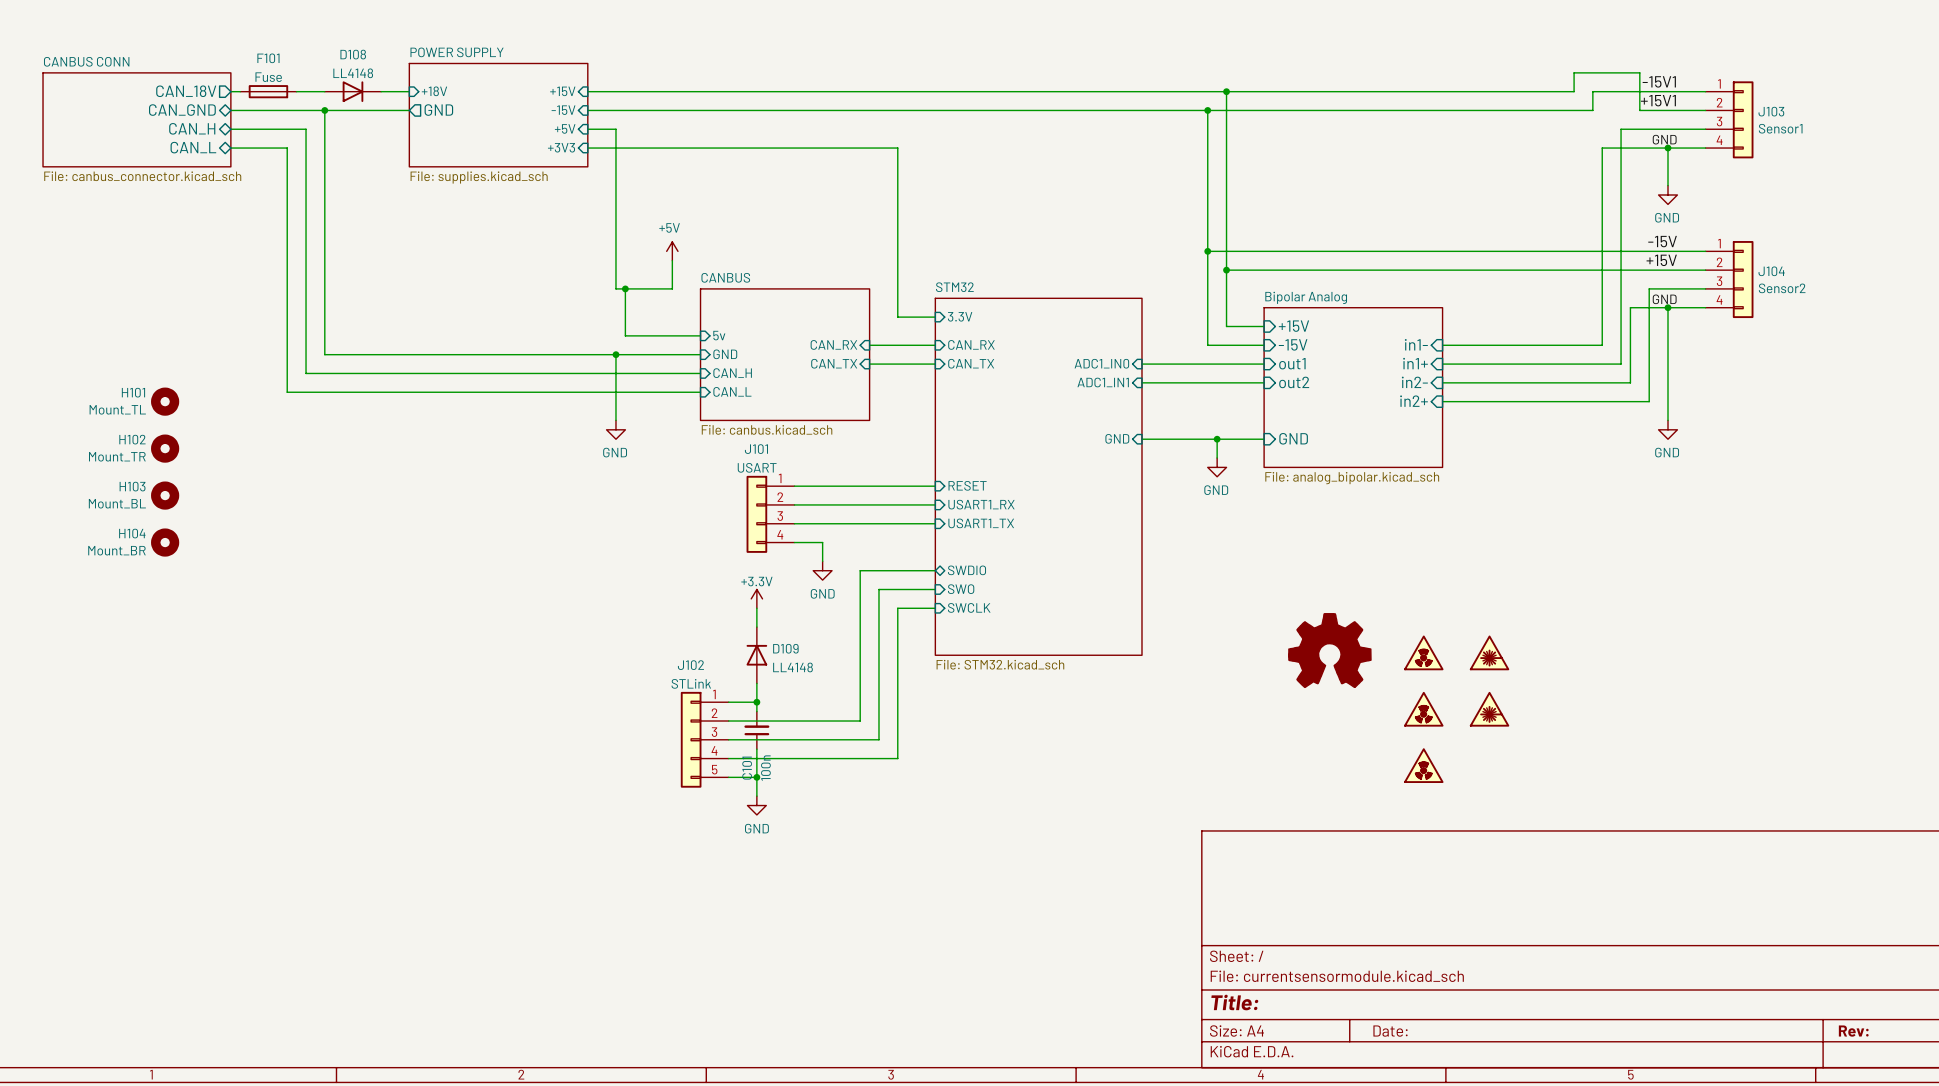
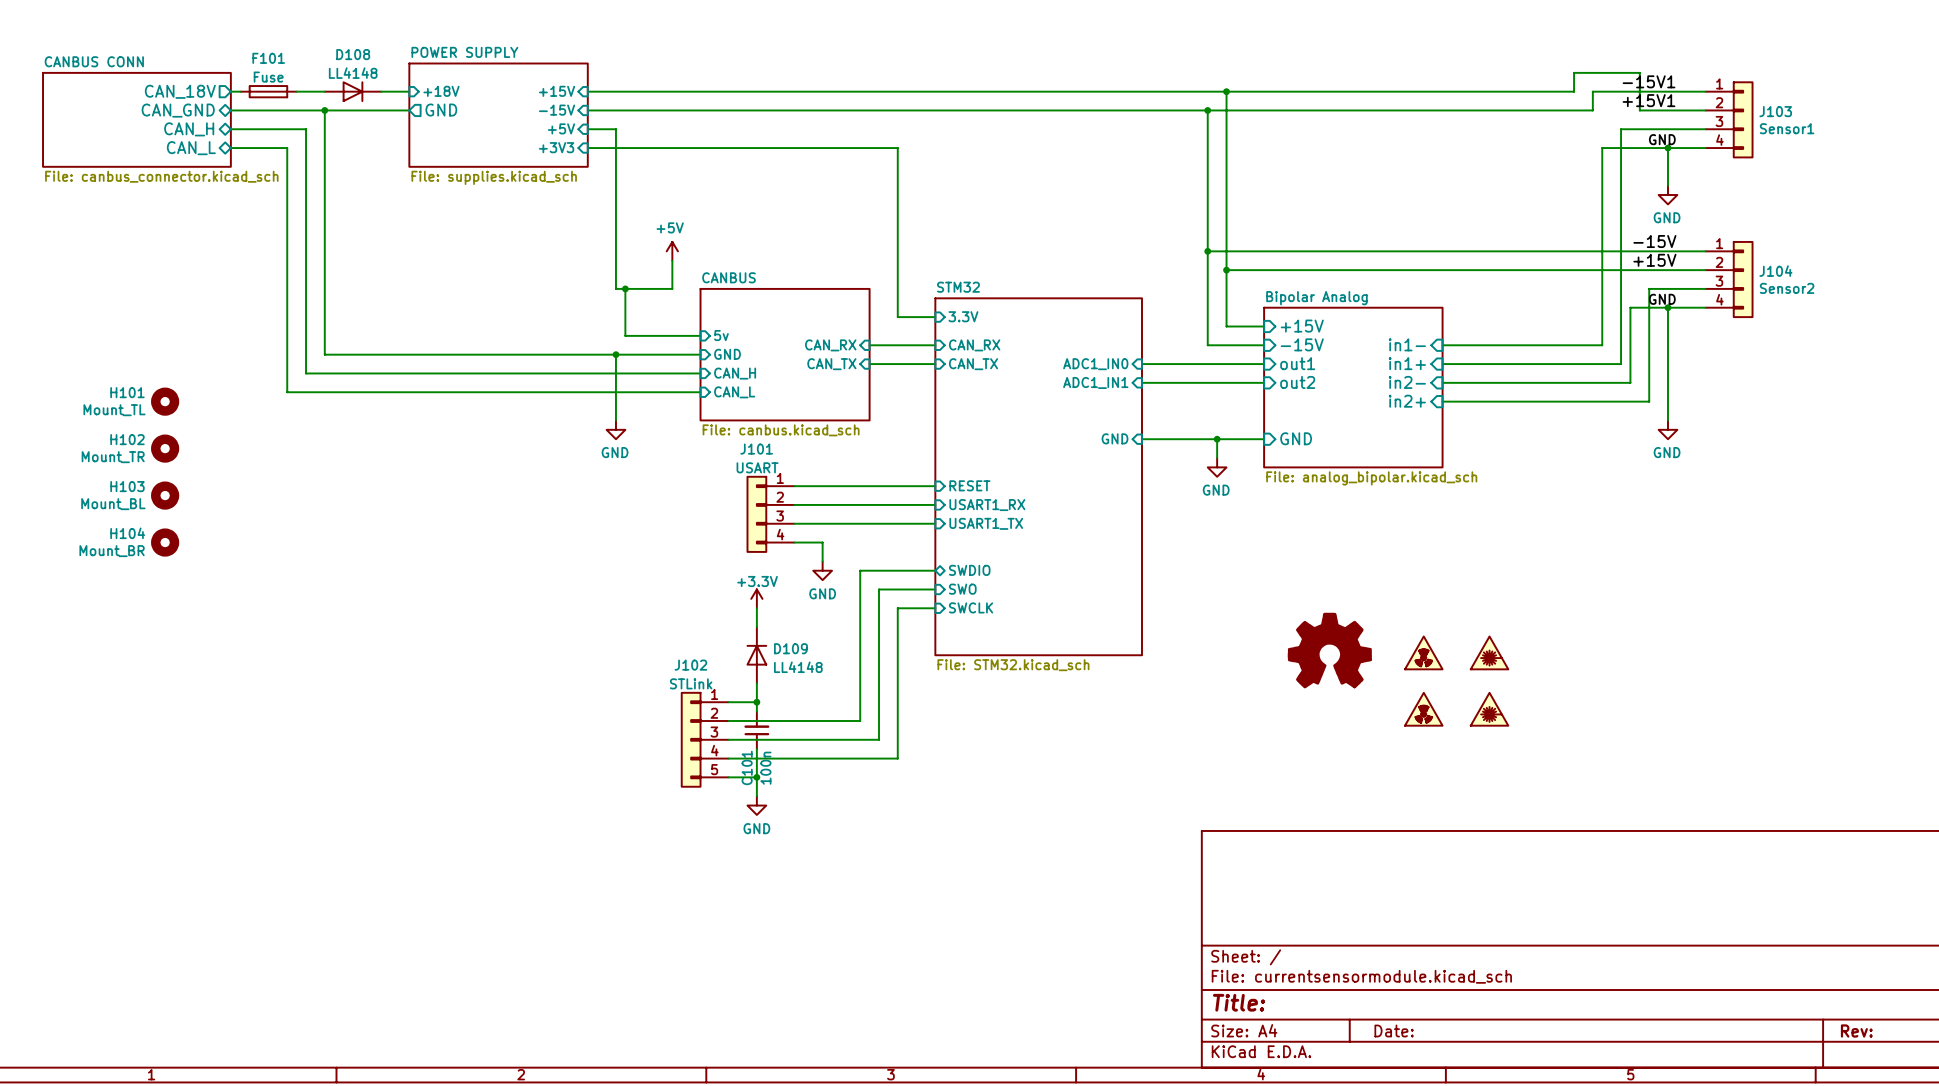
part: (1423, 765) -> none

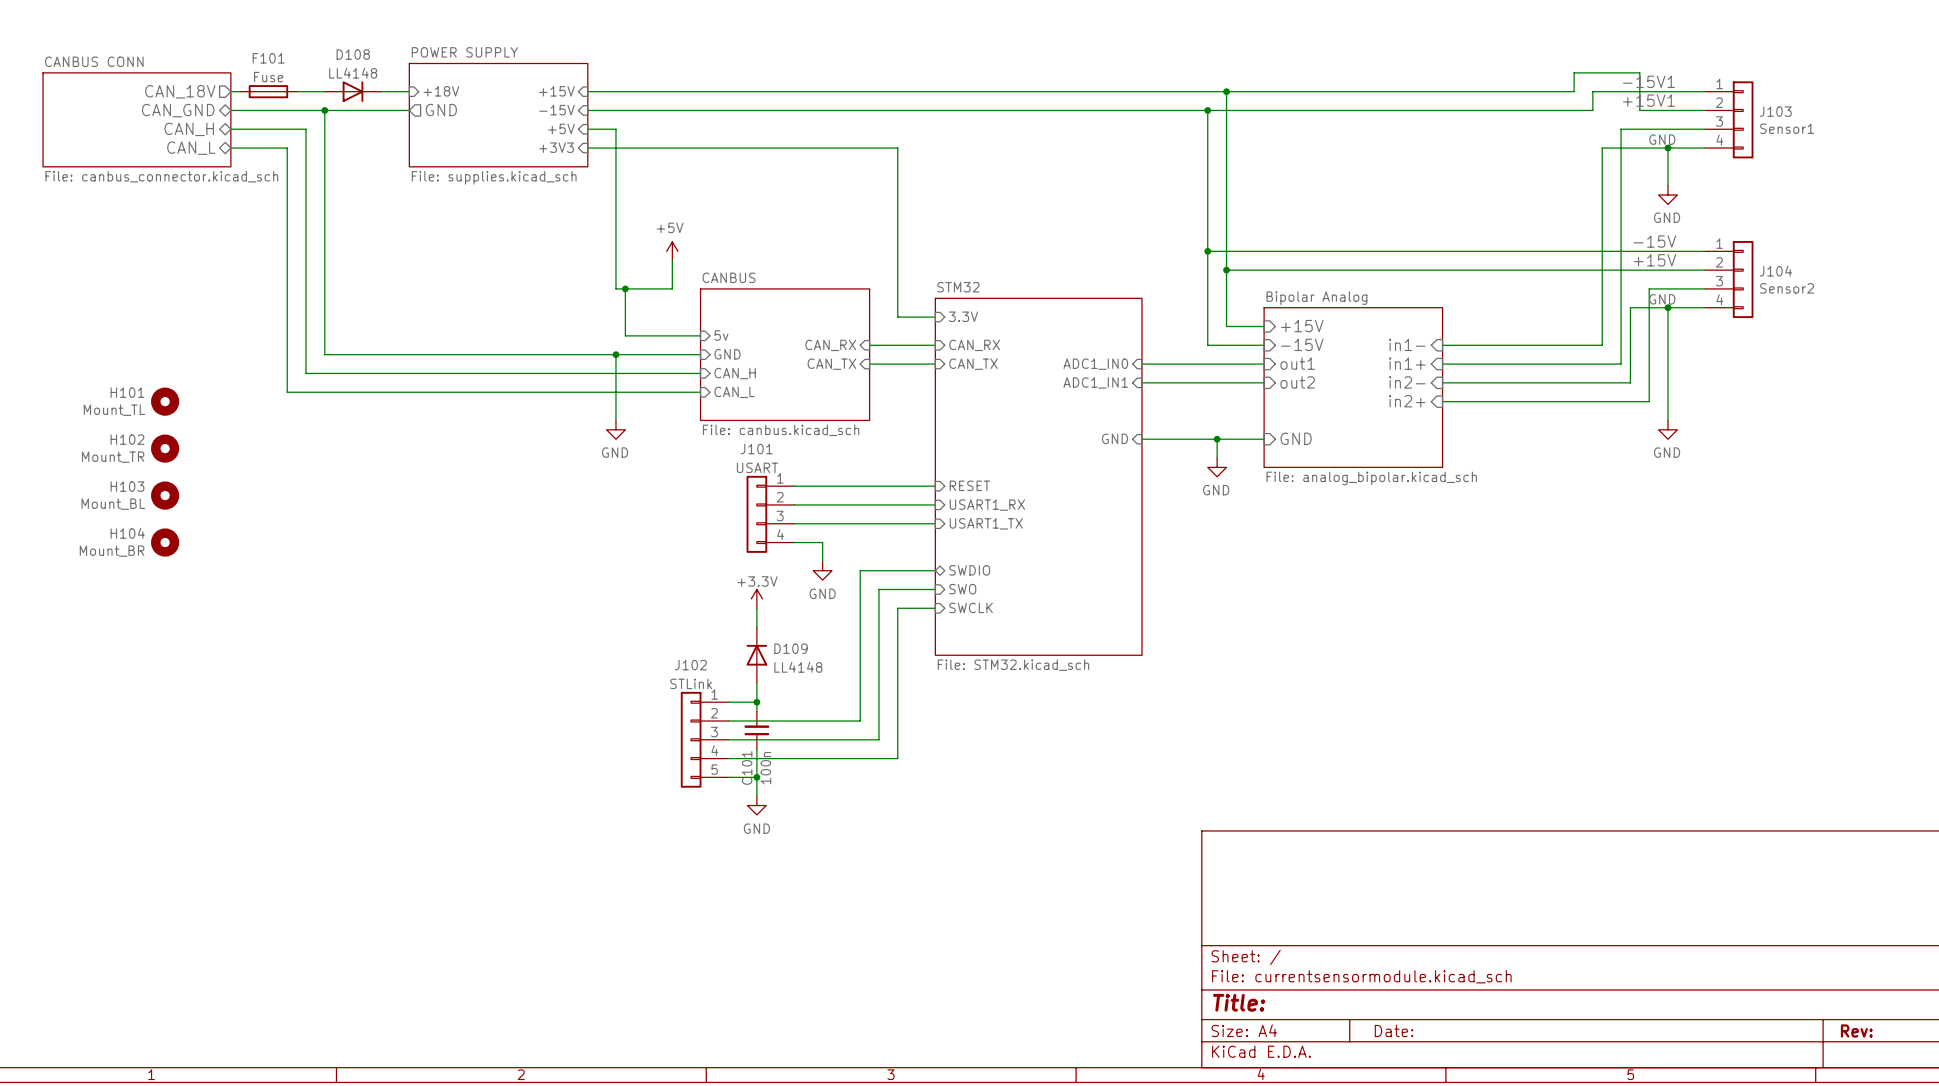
part: (1329, 650) -> none
part: (1423, 652) -> none
part: (1489, 652) -> none
part: (1423, 709) -> none
part: (1489, 709) -> none

